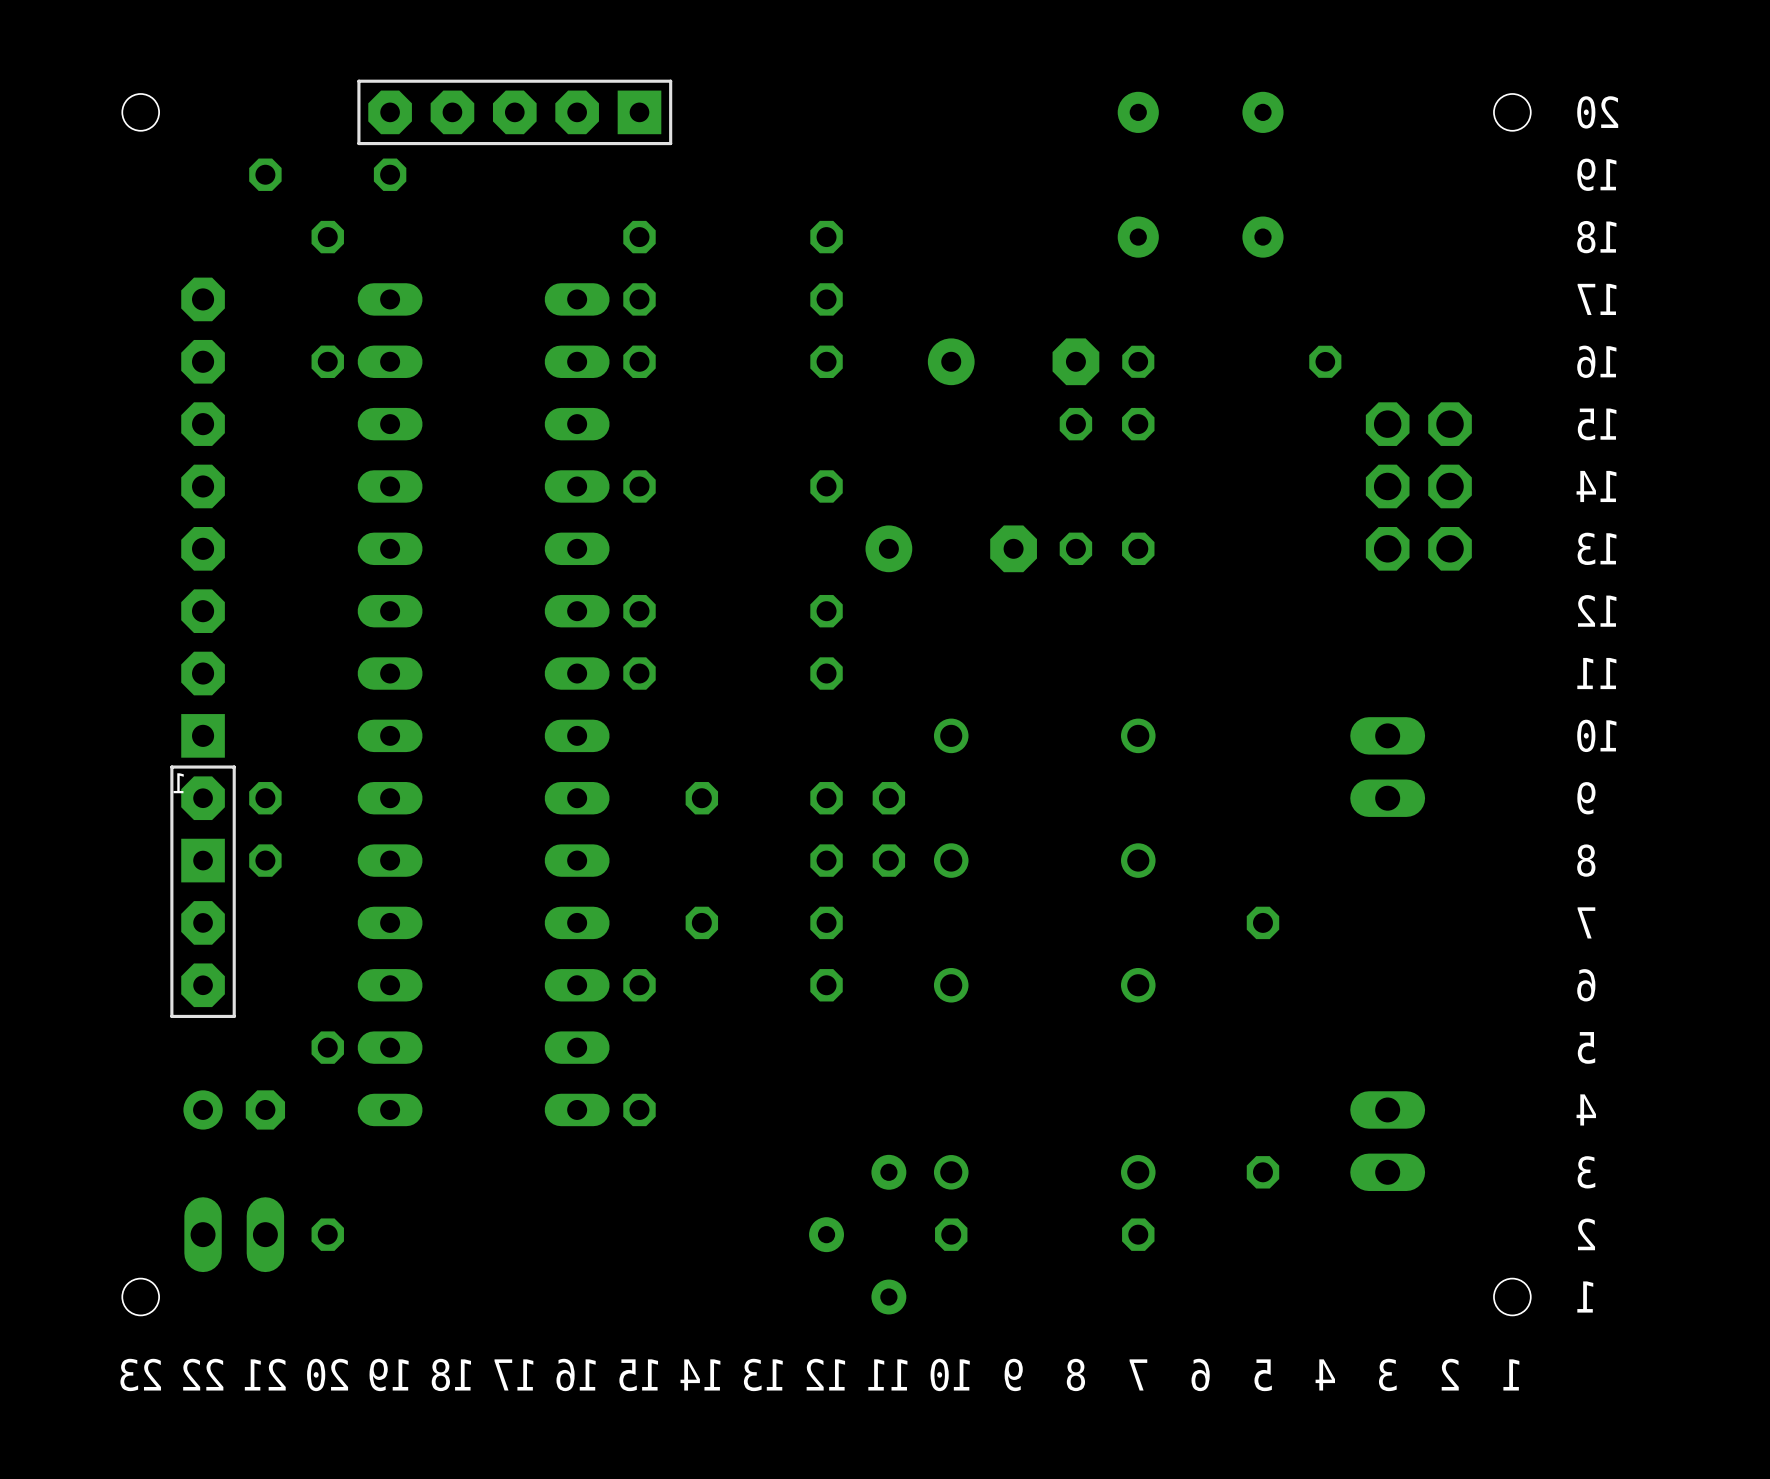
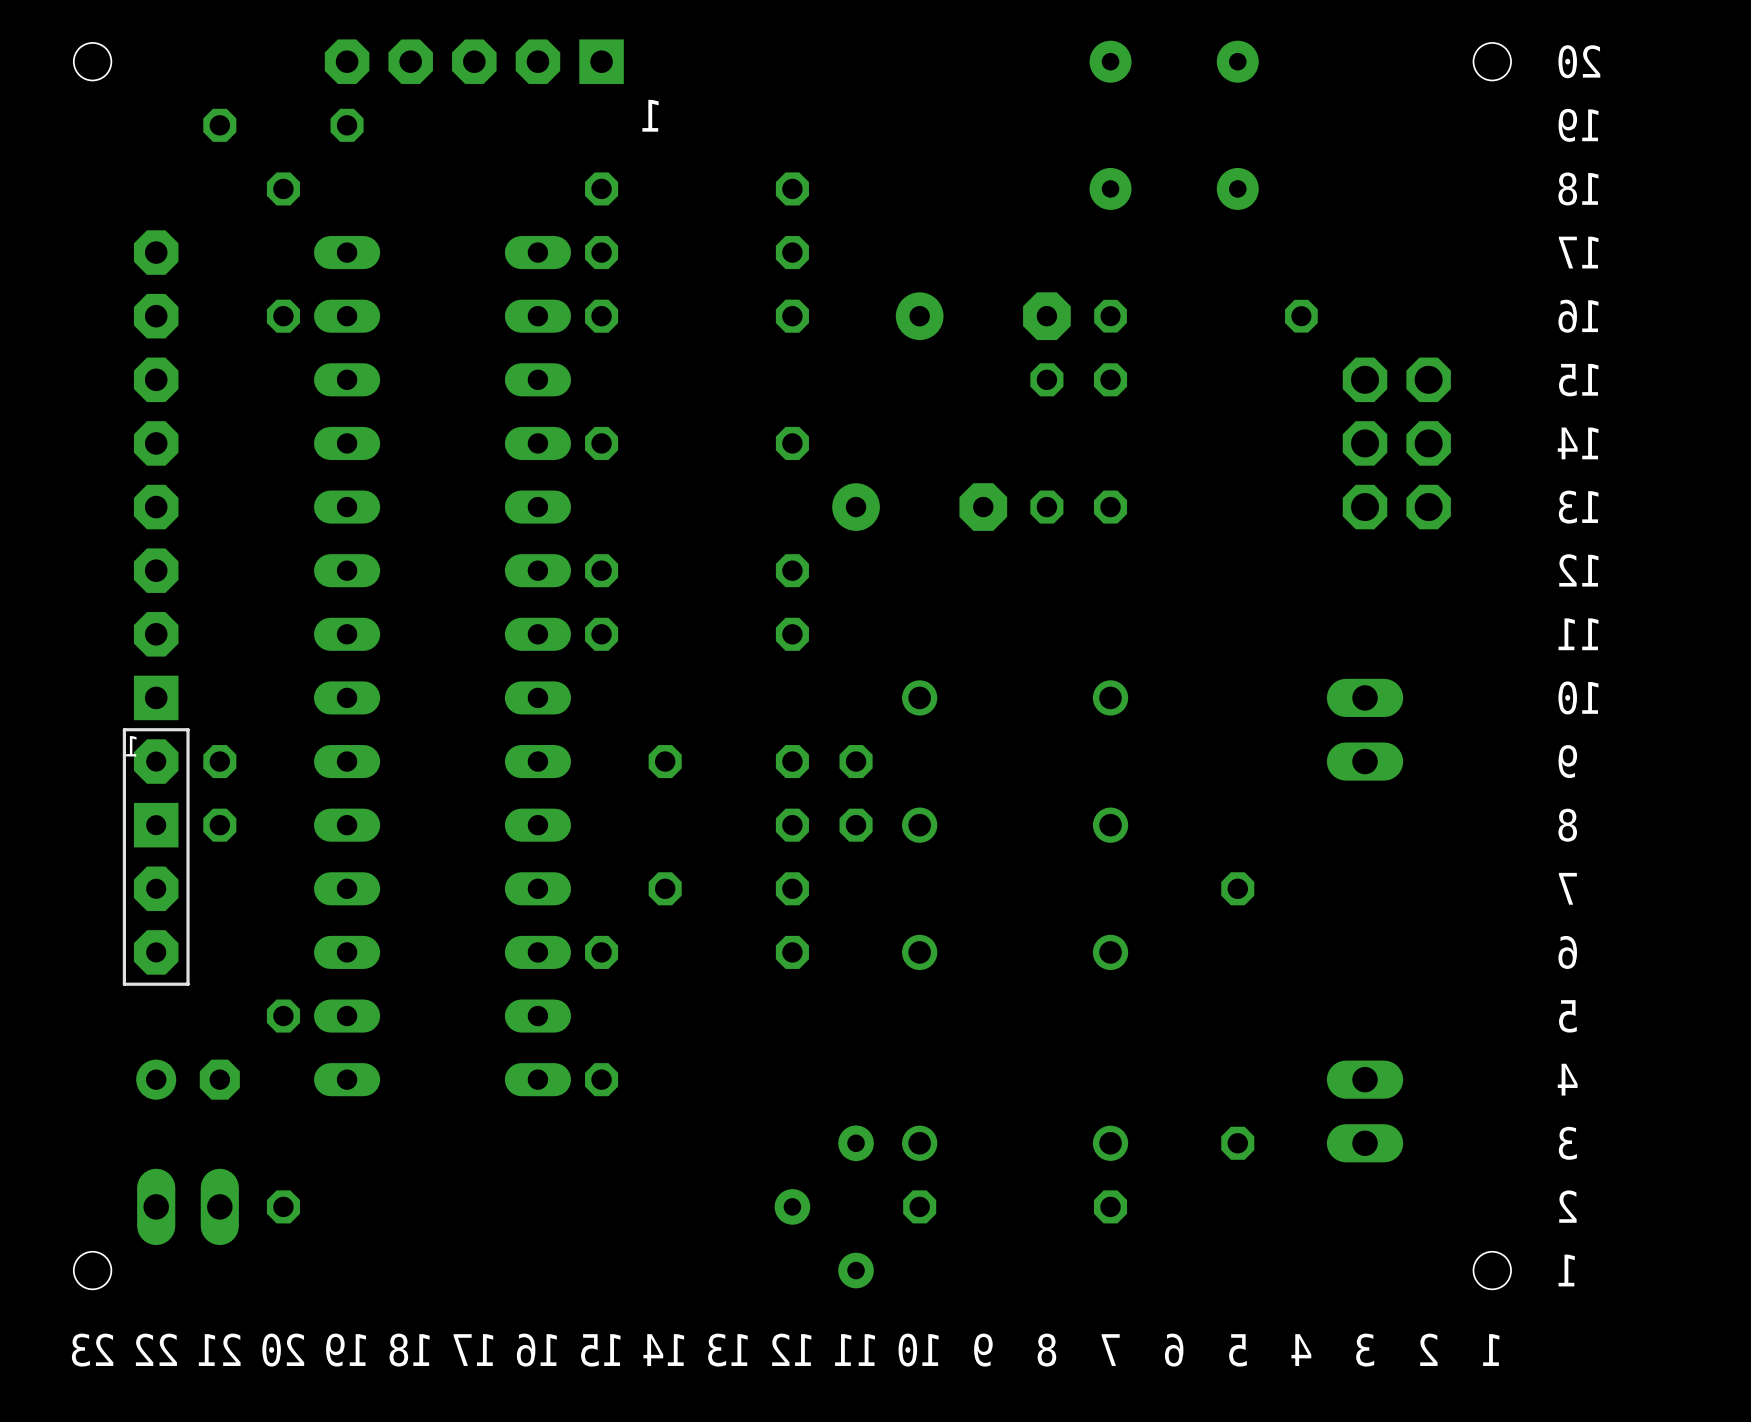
part footprint: [357, 79, 673, 146] -> [324, 39, 624, 84]

